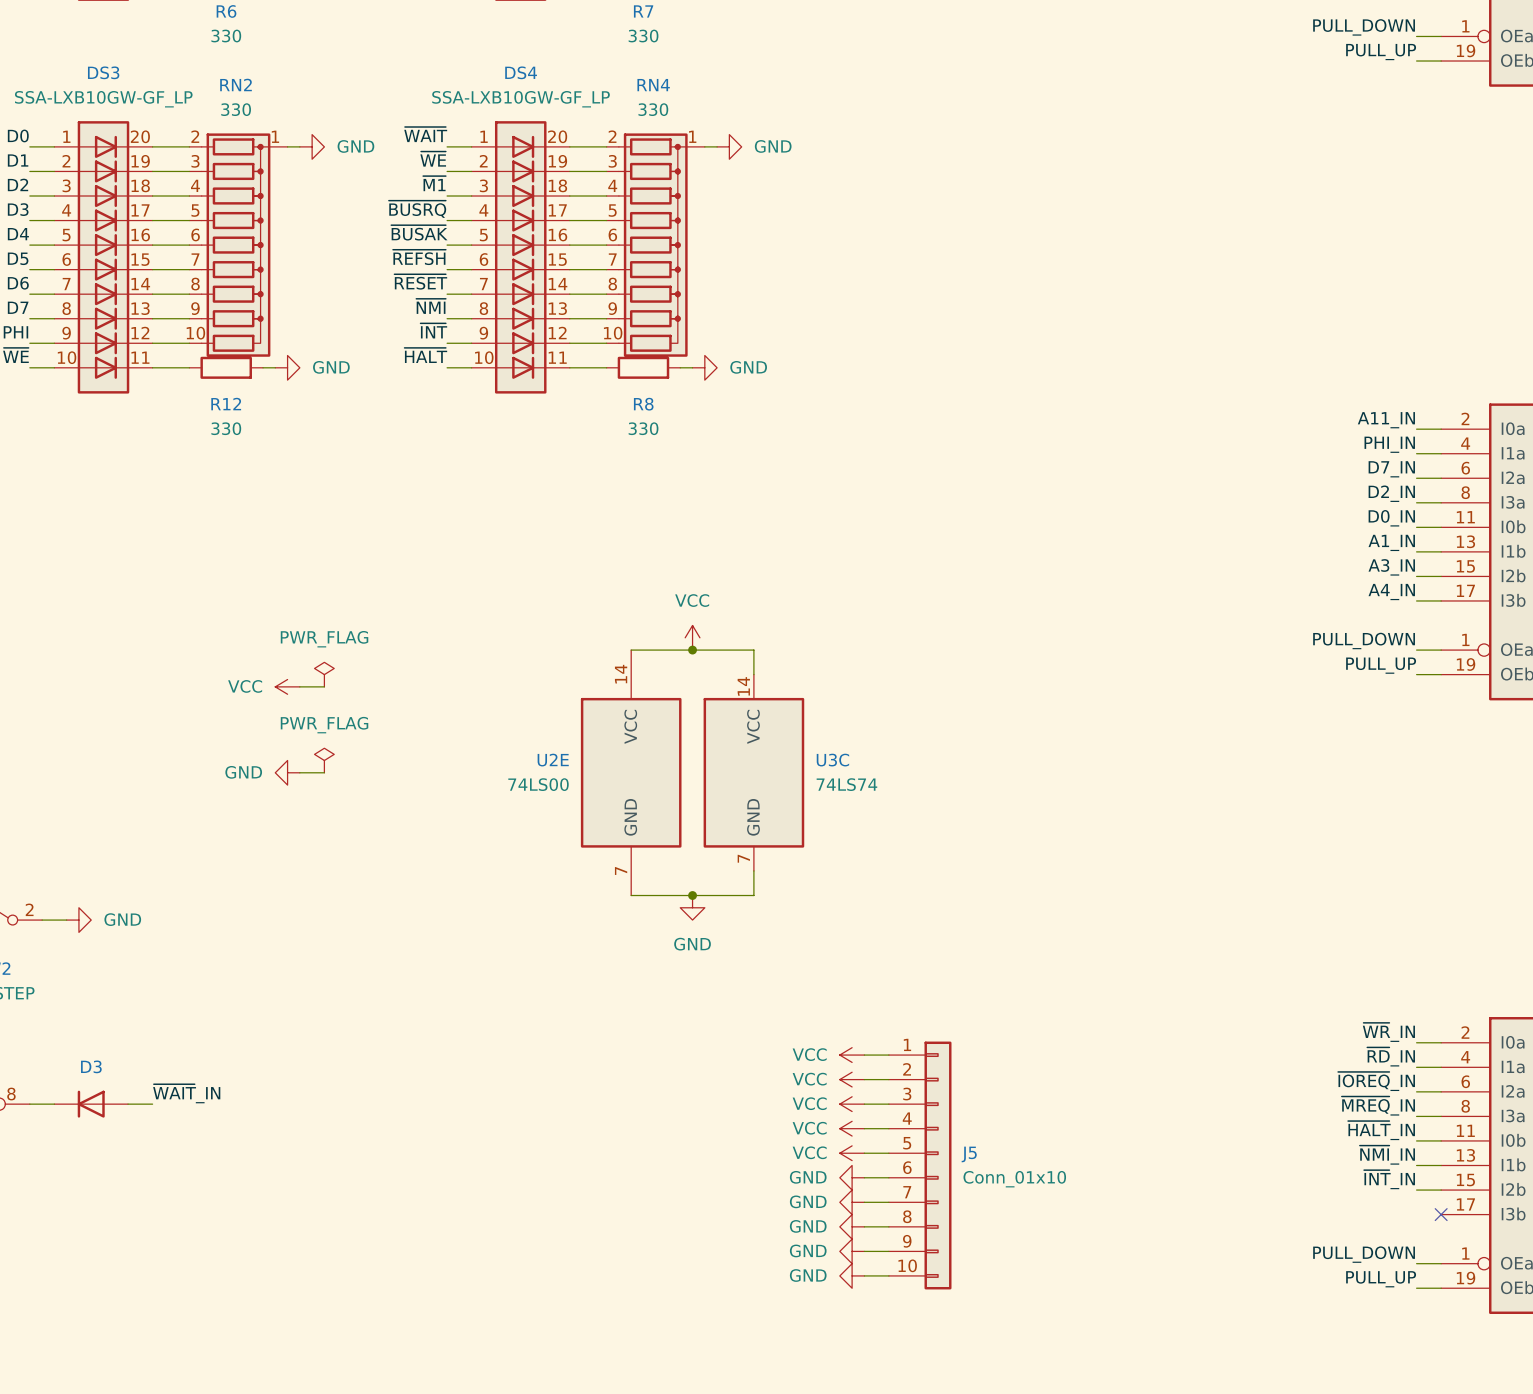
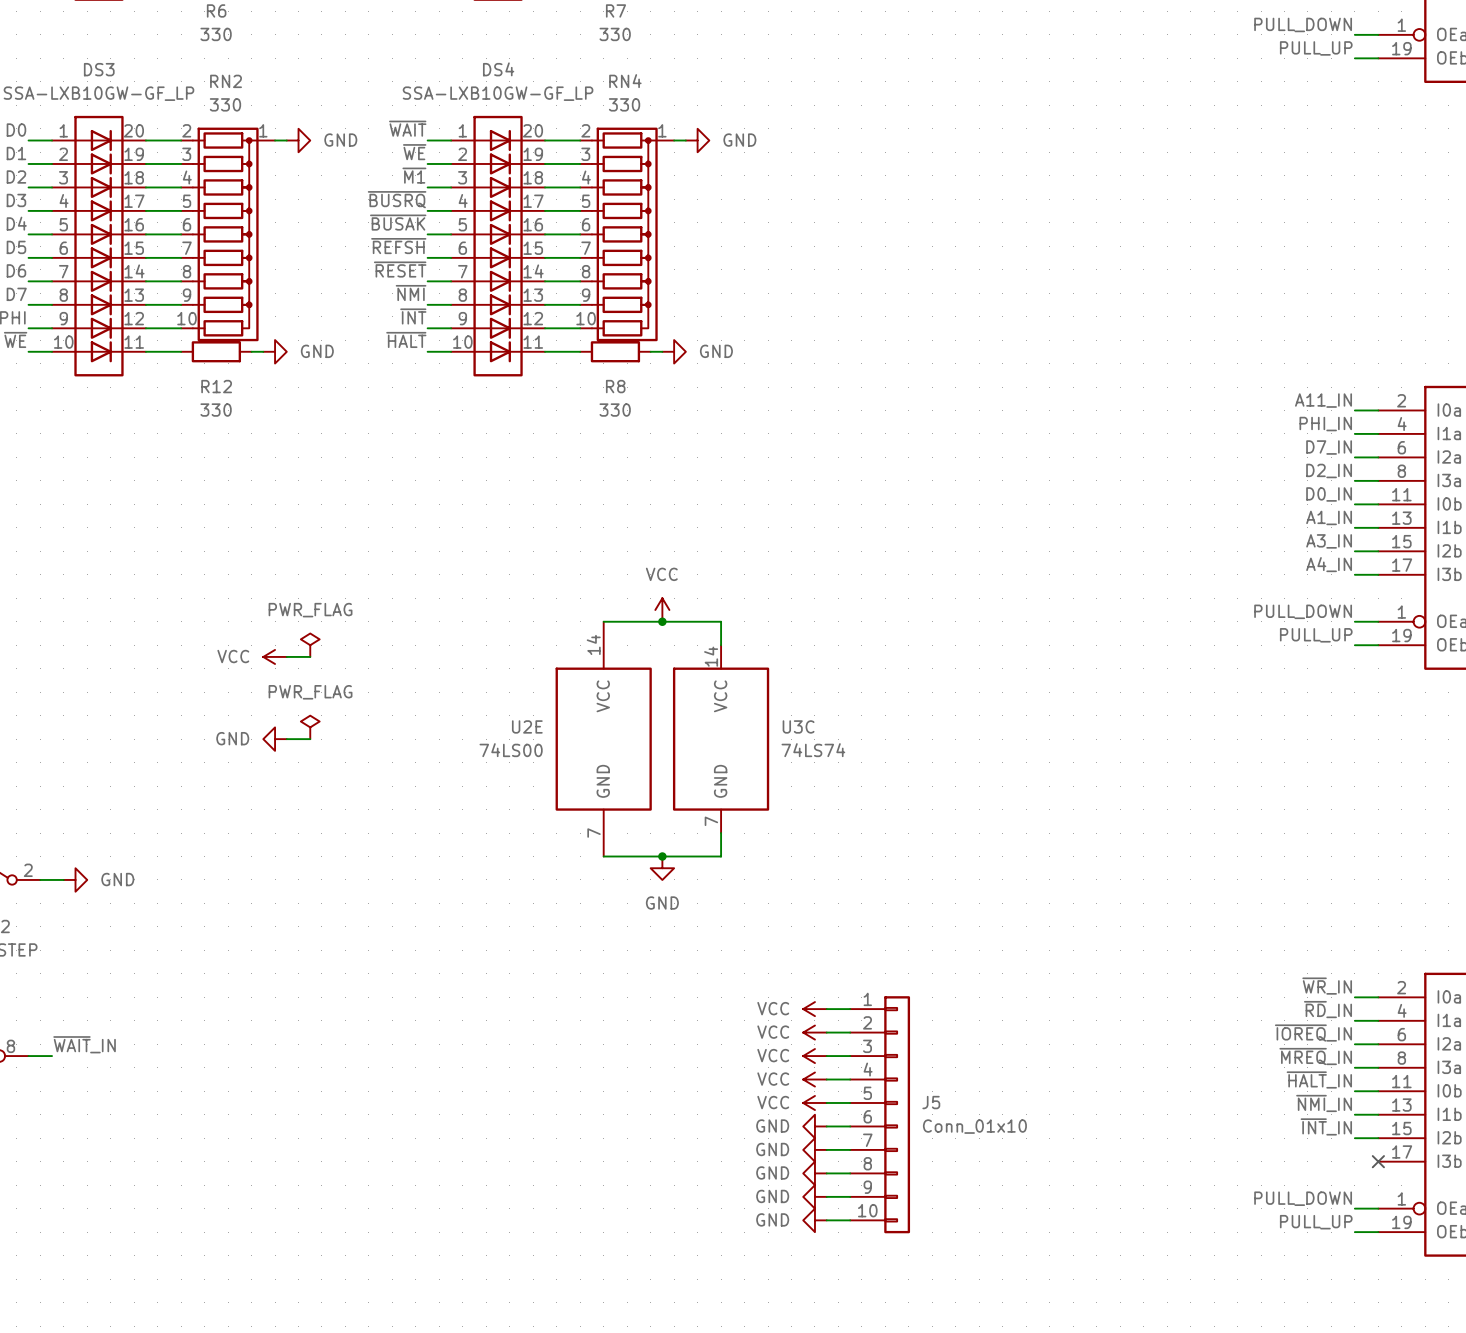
label position: ~{WAIT}_IN (186, 1093) -> ~{WAIT}_IN (84, 1044)
D3: (91, 1104) -> none
wire: (128, 1104) (152, 1104) -> none

